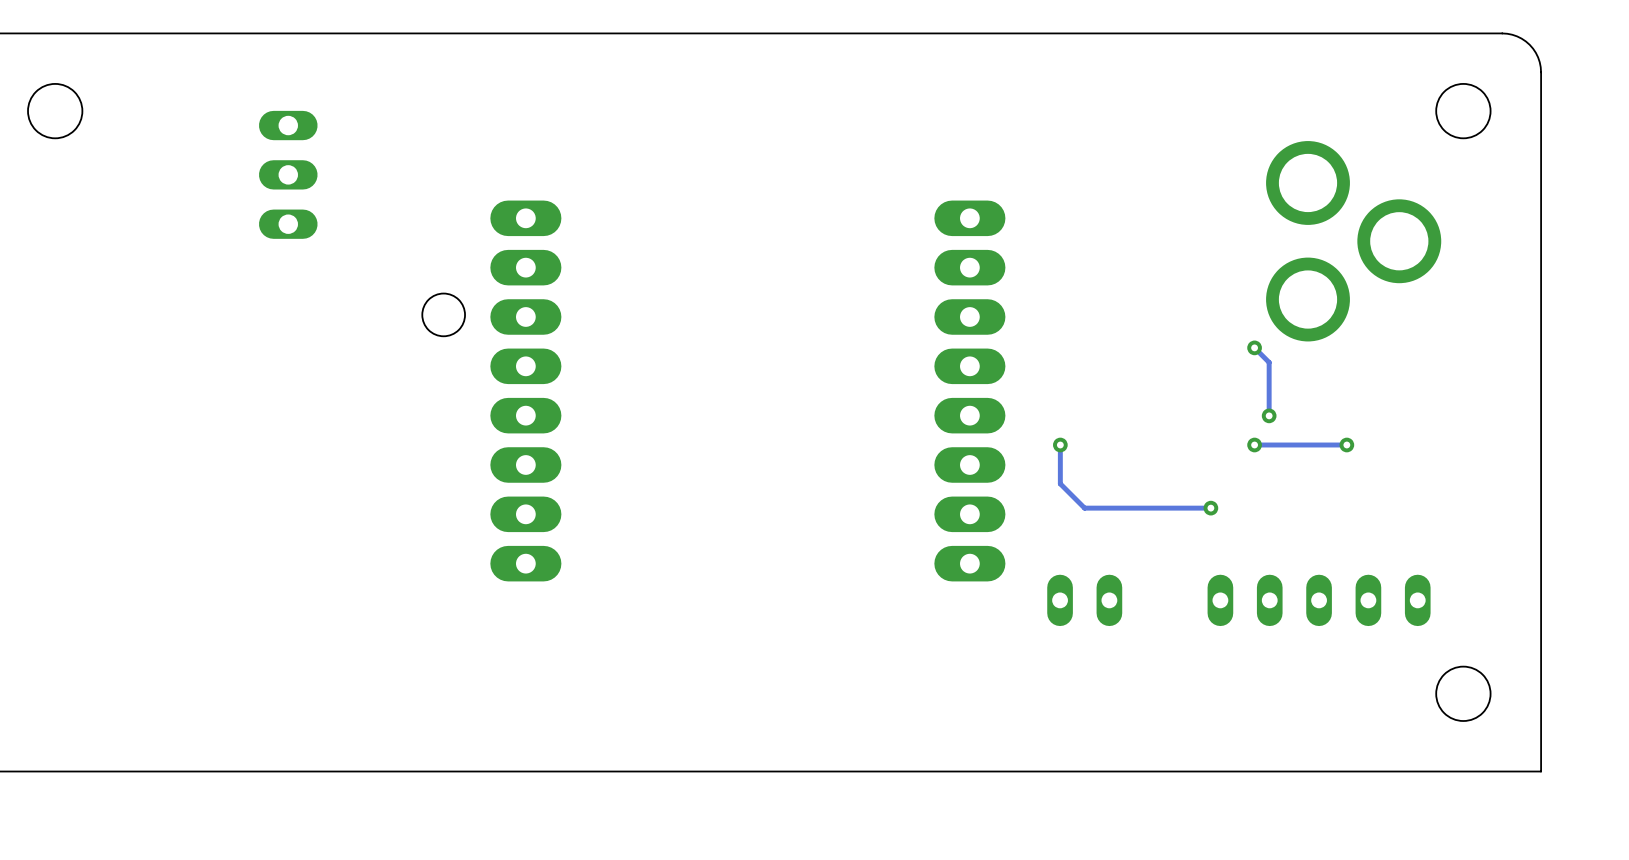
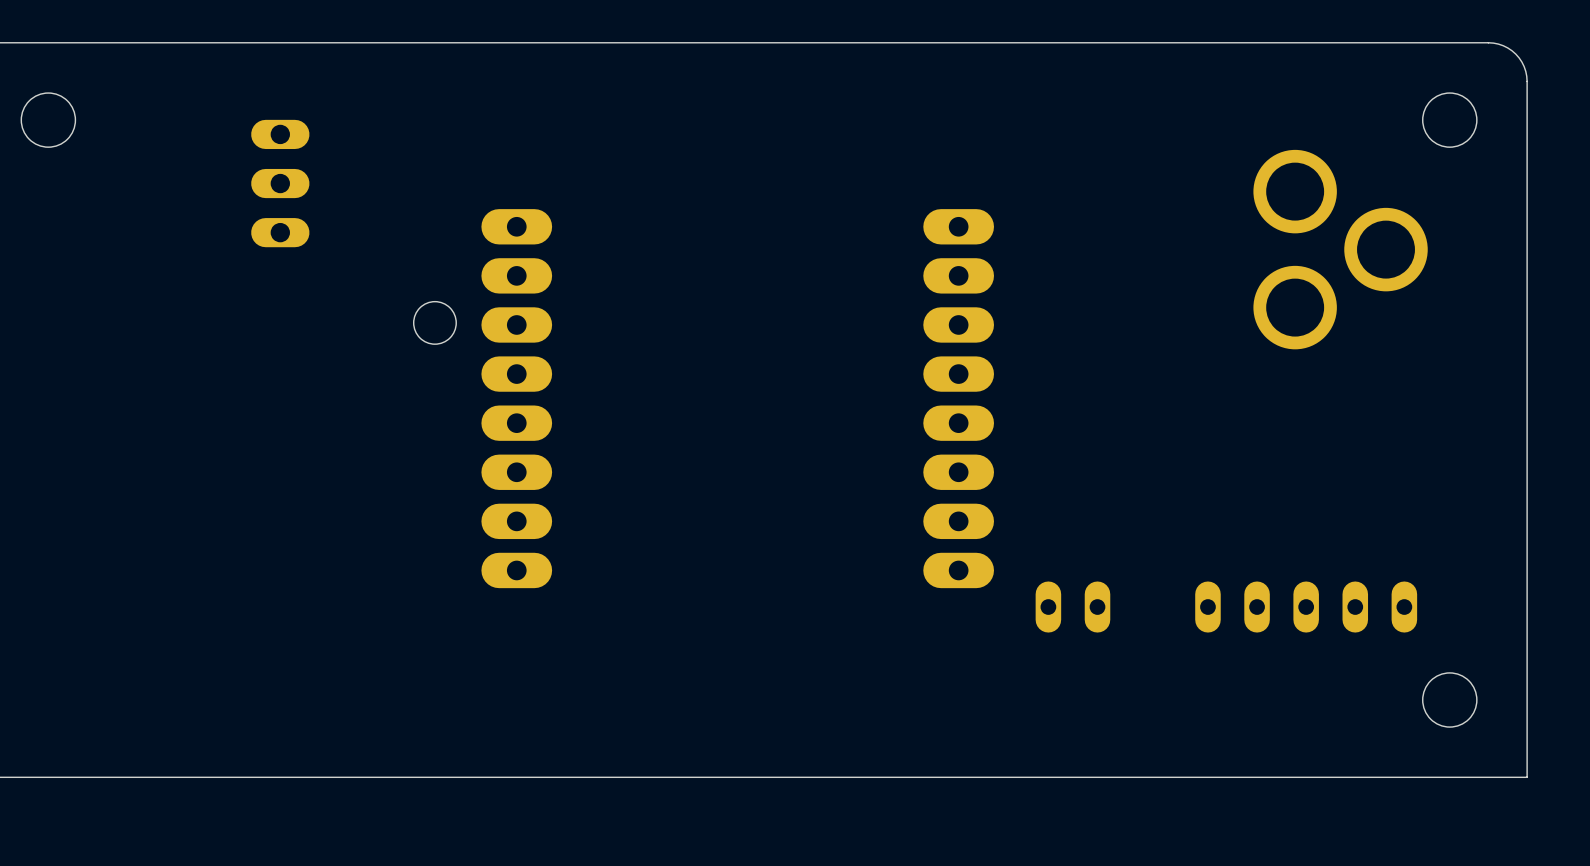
track: (1254, 347) (1269, 362) (1269, 415) -> none
via: (1254, 347) -> none
via: (1269, 415) -> none
track: (1060, 445) (1060, 483) (1084, 508) (1210, 508) -> none
via: (1060, 445) -> none
via: (1254, 445) -> none
track: (1346, 445) (1254, 445) -> none
via: (1346, 445) -> none
via: (1210, 508) -> none

